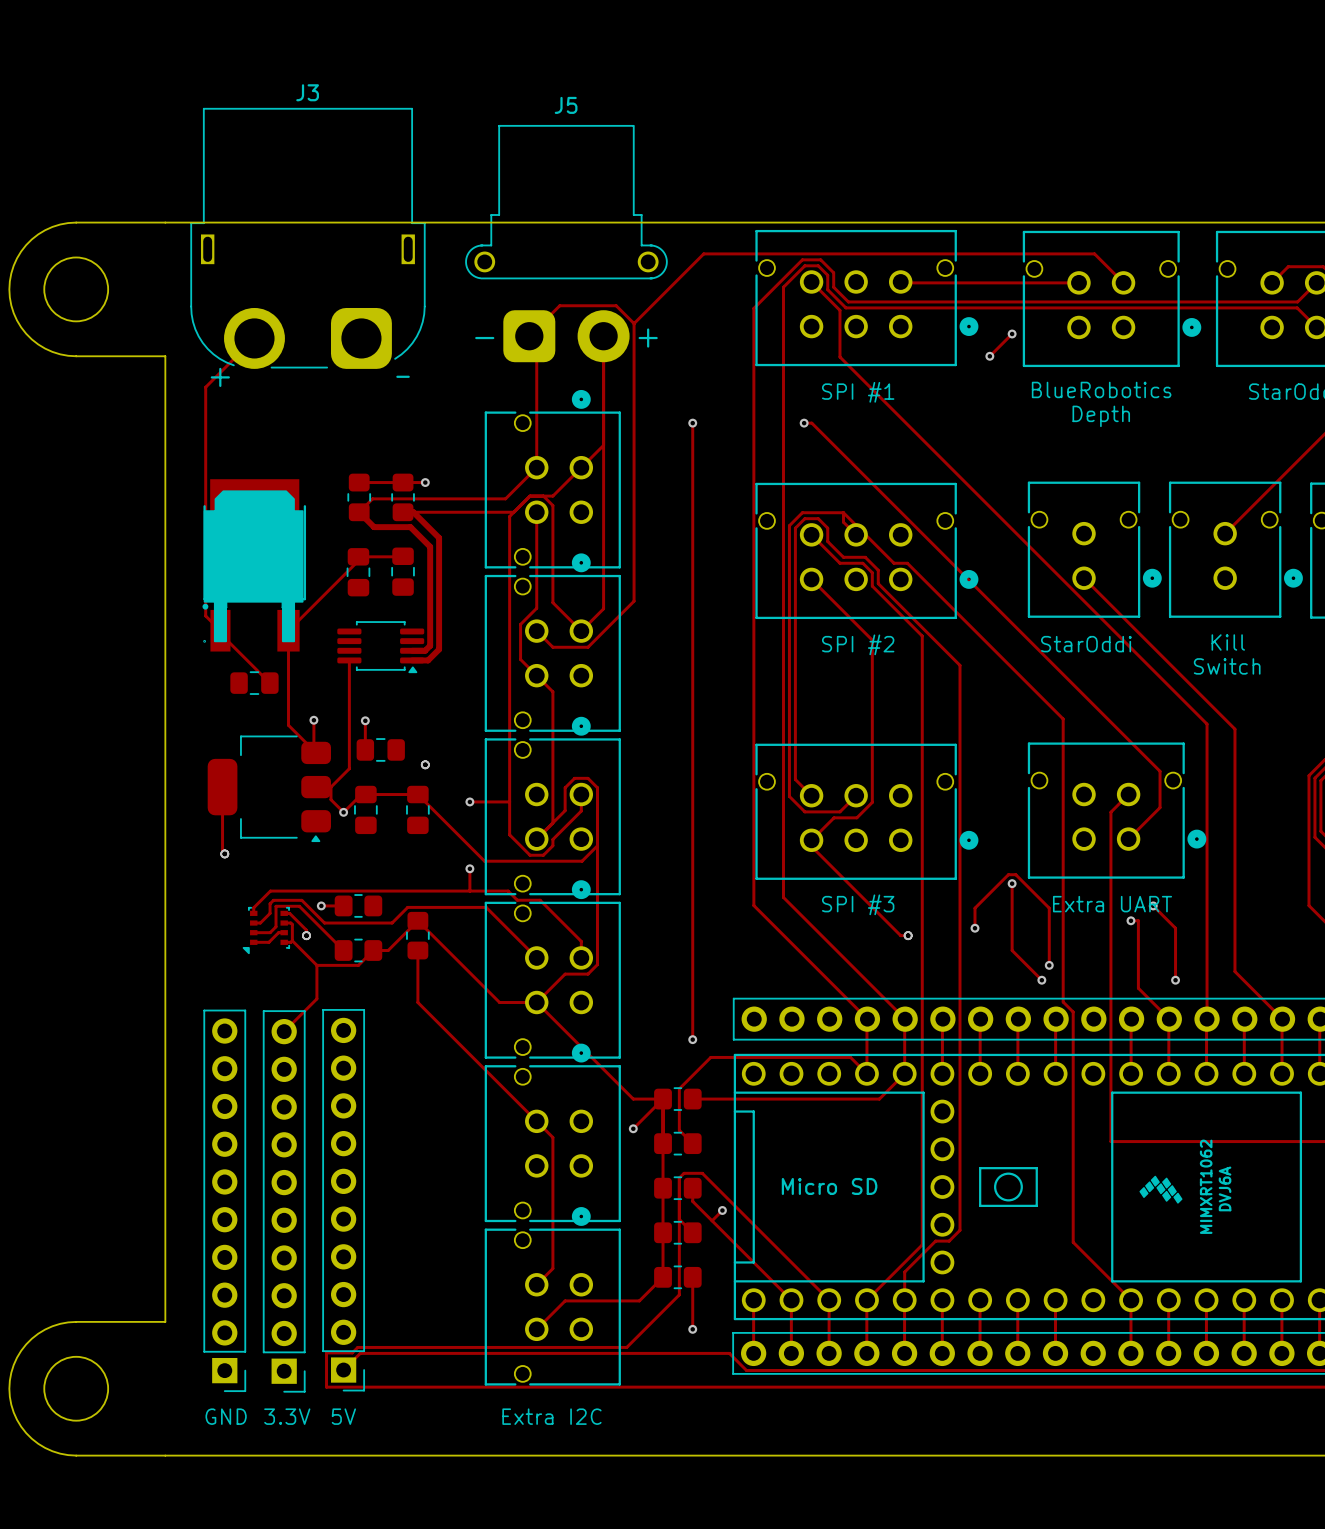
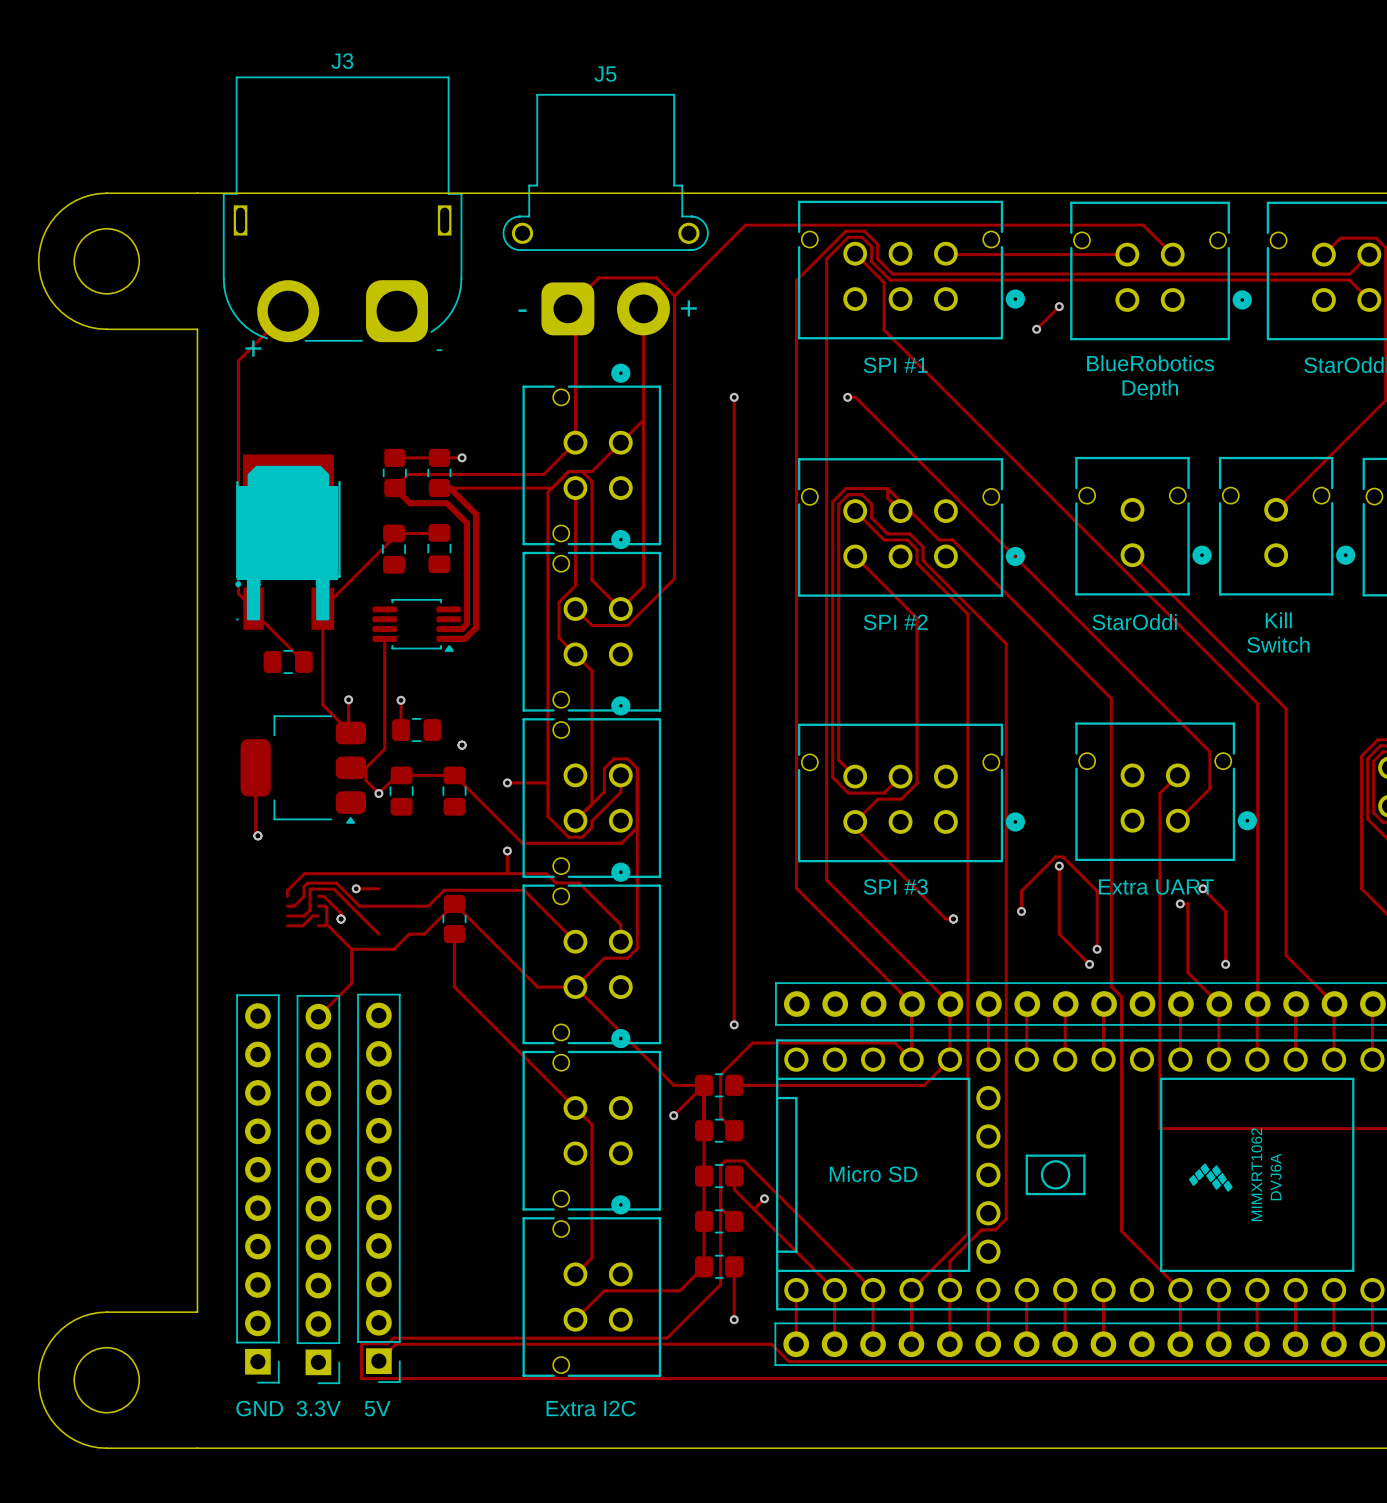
part: (358, 905) -> none
part: (266, 930) -> none
part: (358, 950) -> none

